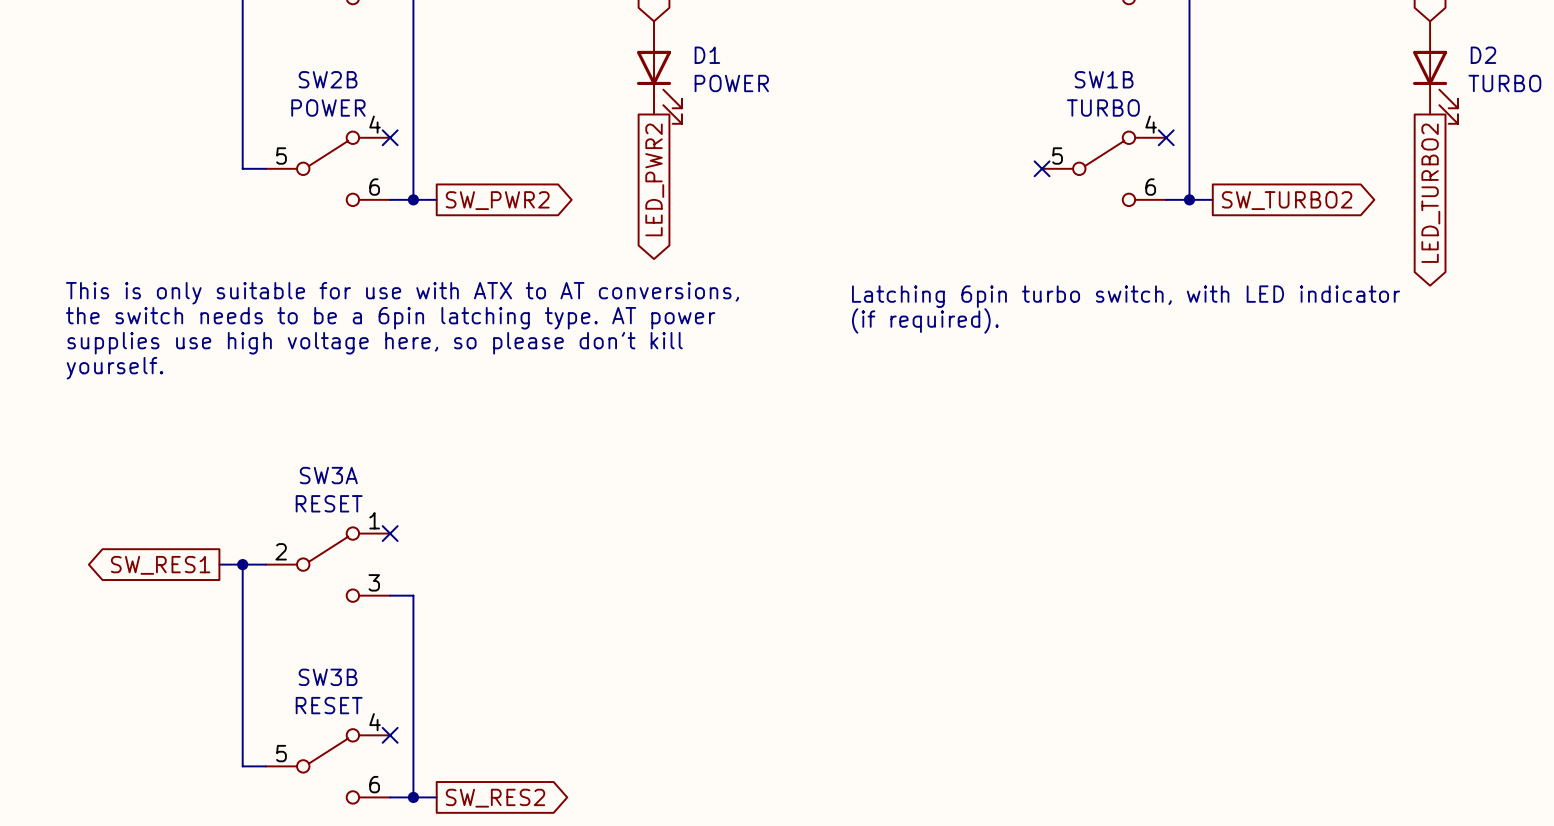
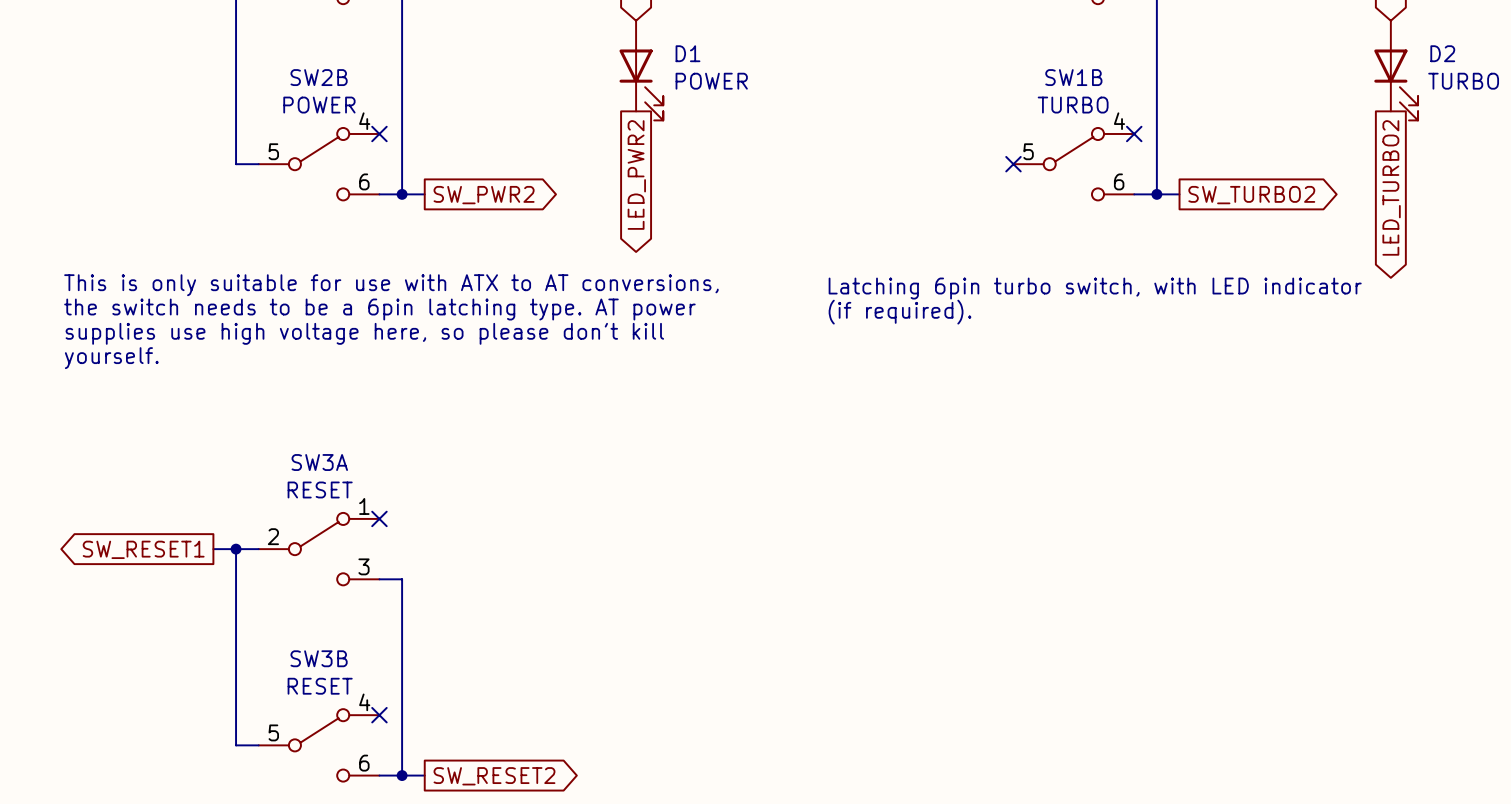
global label: SW_RES1 (160, 565) -> SW_RESET1 (143, 549)
global label: SW_RES2 (495, 798) -> SW_RESET2 (494, 776)

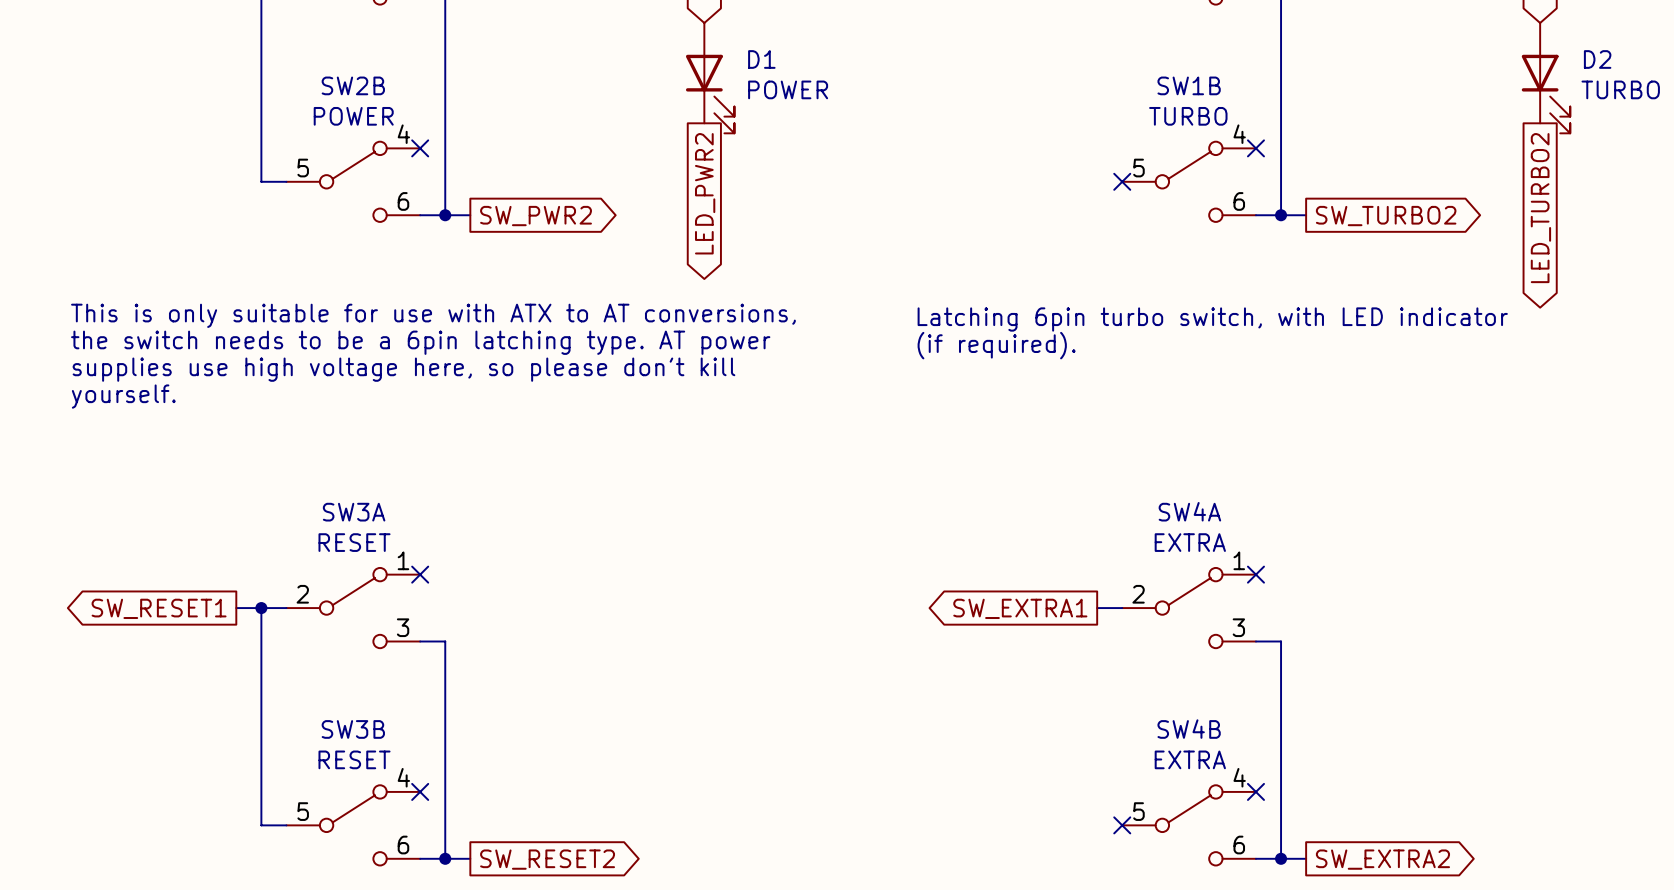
no-connect mark: none -> (1255, 574)
global label: none -> SW_EXTRA1 (1020, 608)
wire: none -> (1097, 608) (1122, 608)
SW4A: none -> EXTRA (1189, 608)
wire: none -> (1255, 641) (1281, 641) (1281, 858)
no-connect mark: none -> (1255, 791)
no-connect mark: none -> (1122, 825)
SW4B: none -> EXTRA (1189, 825)
wire: none -> (1255, 858) (1306, 858)
junction: none -> (1281, 858)
global label: none -> SW_EXTRA2 (1382, 859)

